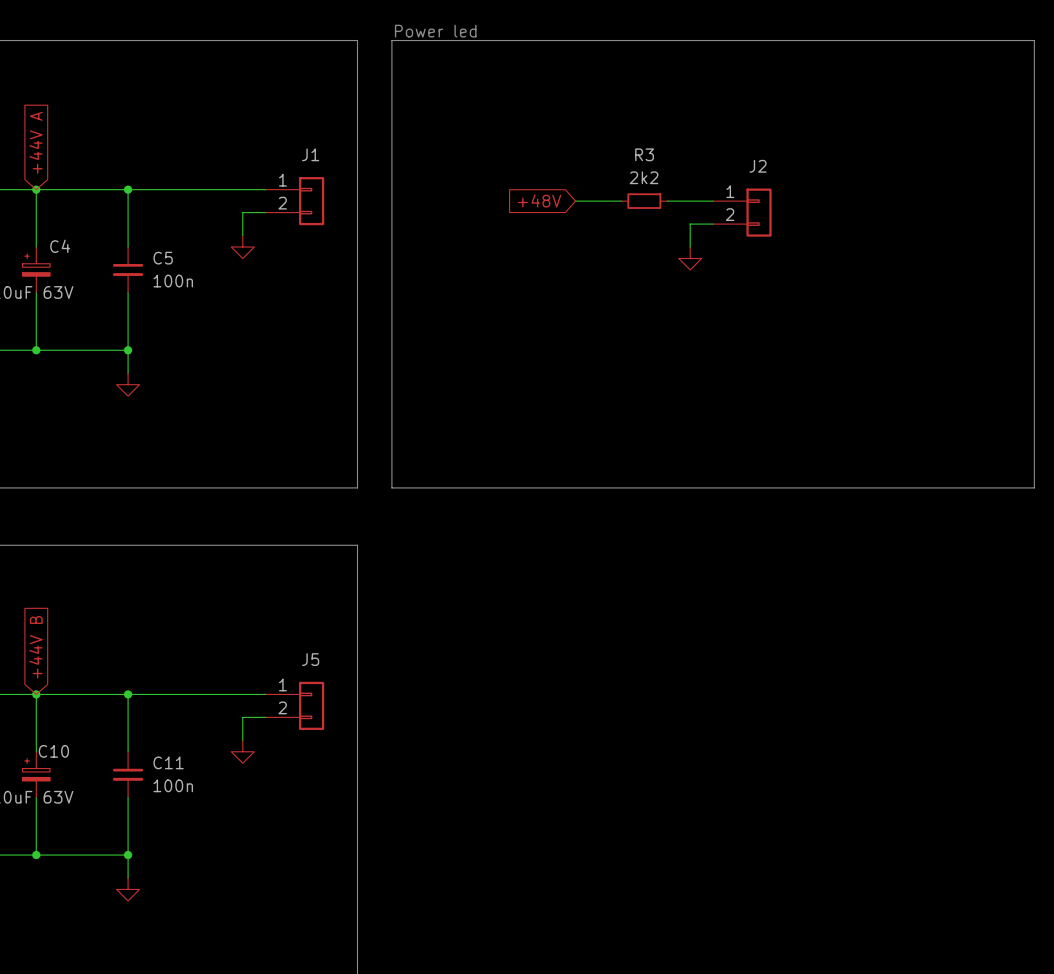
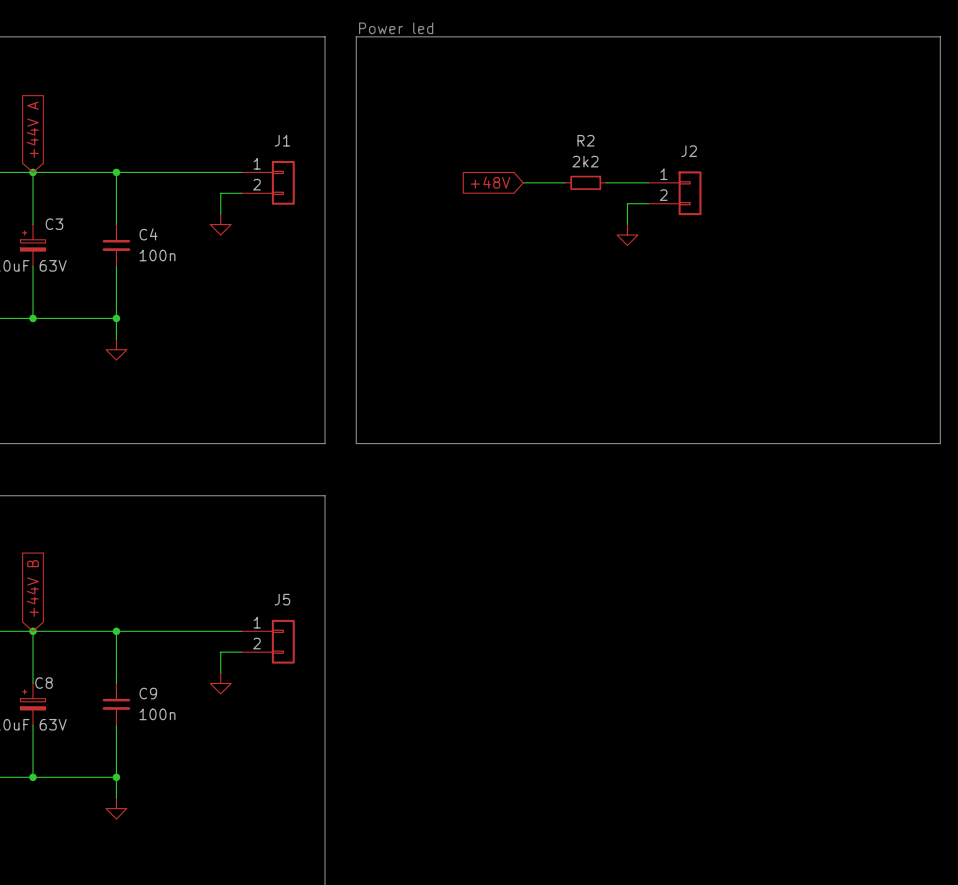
R3 name: R3 (644, 154) -> R2 (585, 140)
C4 name: C4 (60, 246) -> C3 (54, 224)
C5 name: C5 (163, 258) -> C4 (148, 234)
C10 name: C10 (53, 751) -> C8 (44, 683)
C11 name: C11 (168, 762) -> C9 (148, 693)

